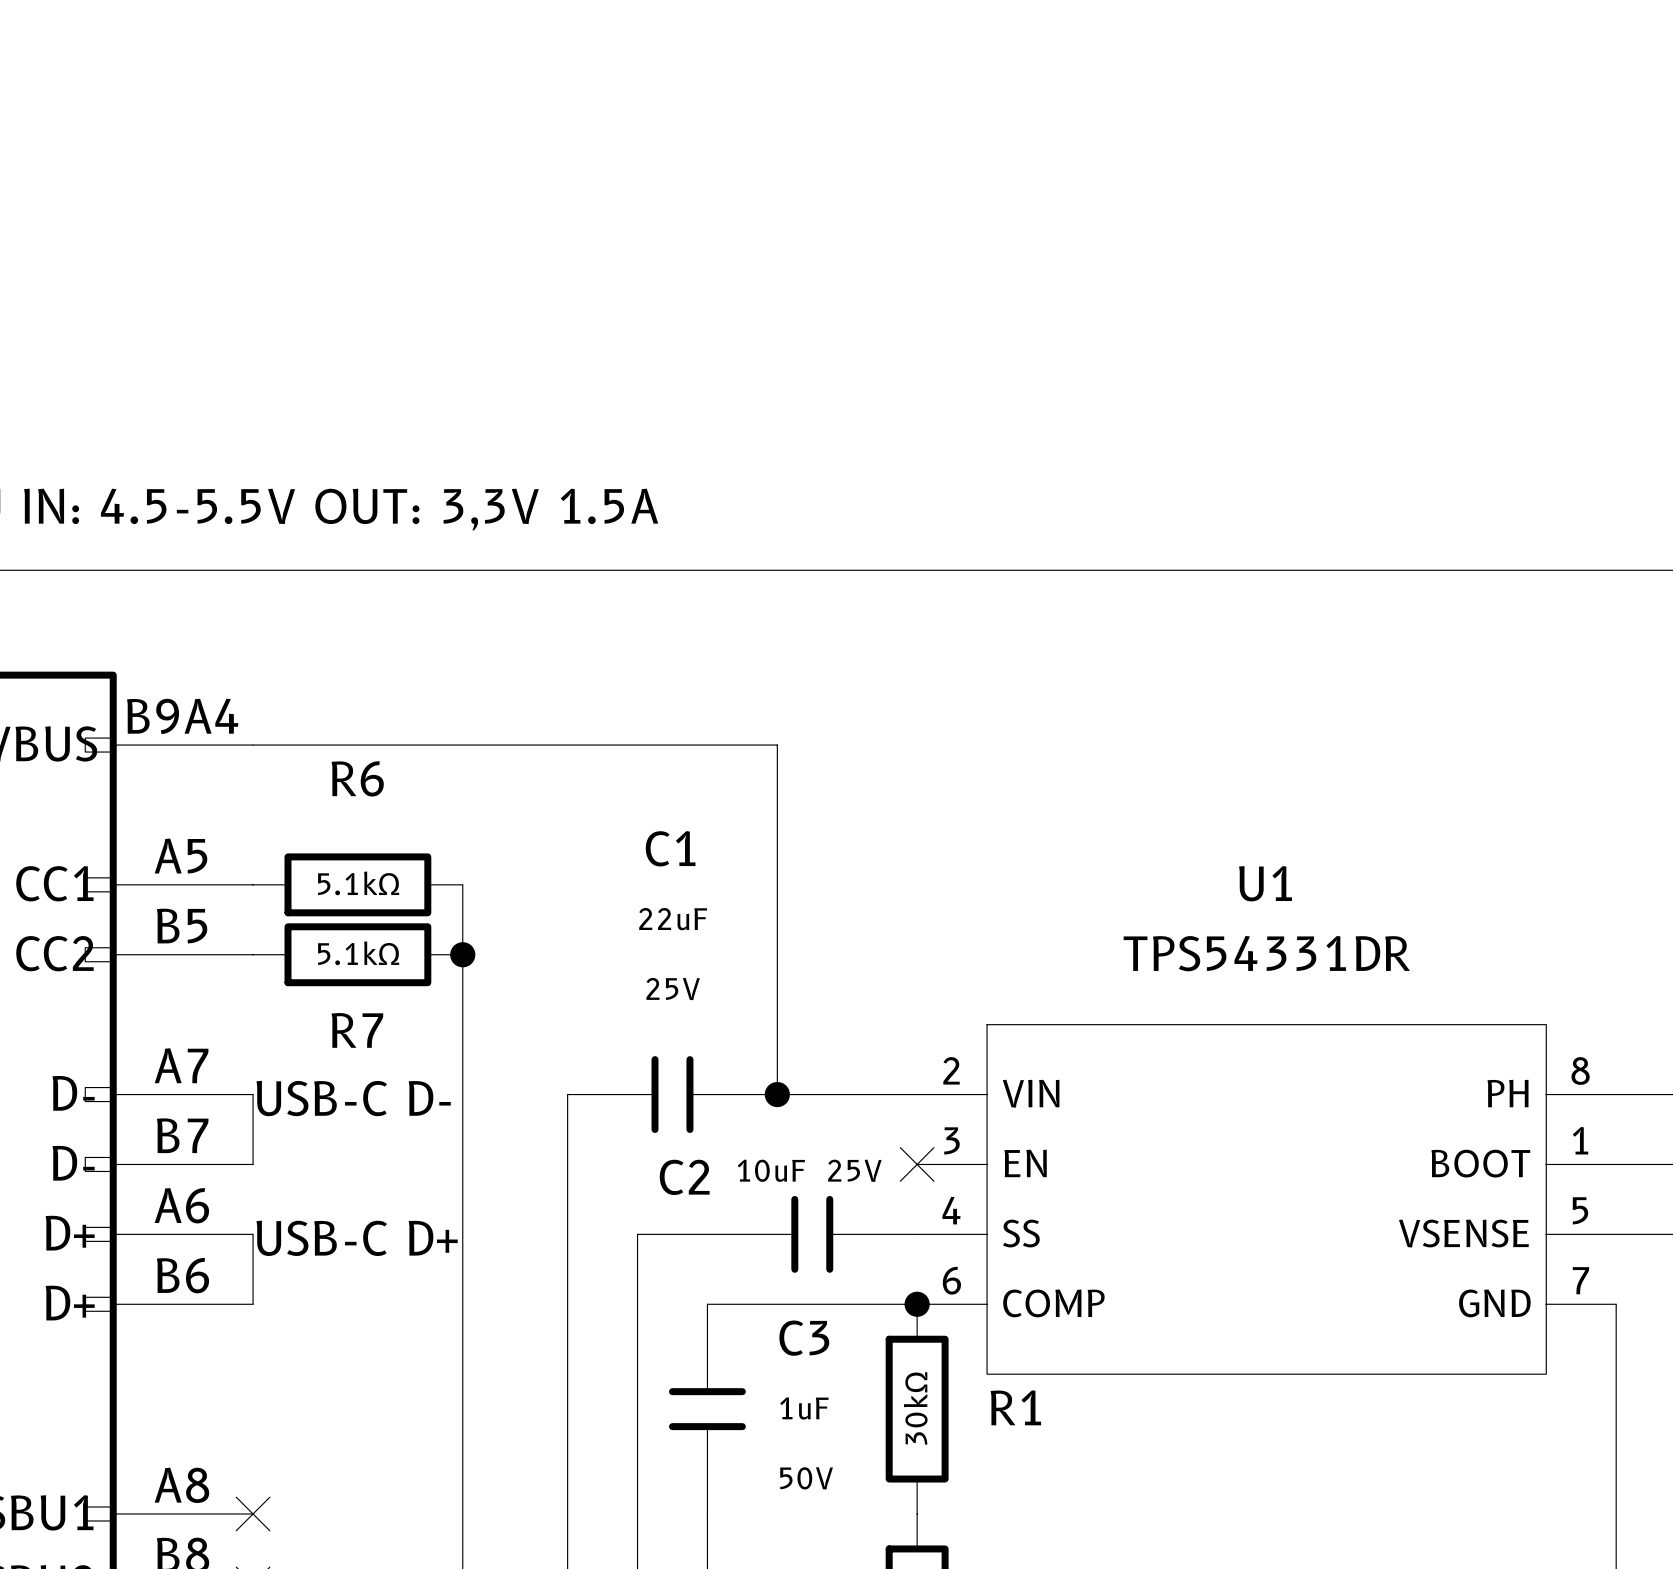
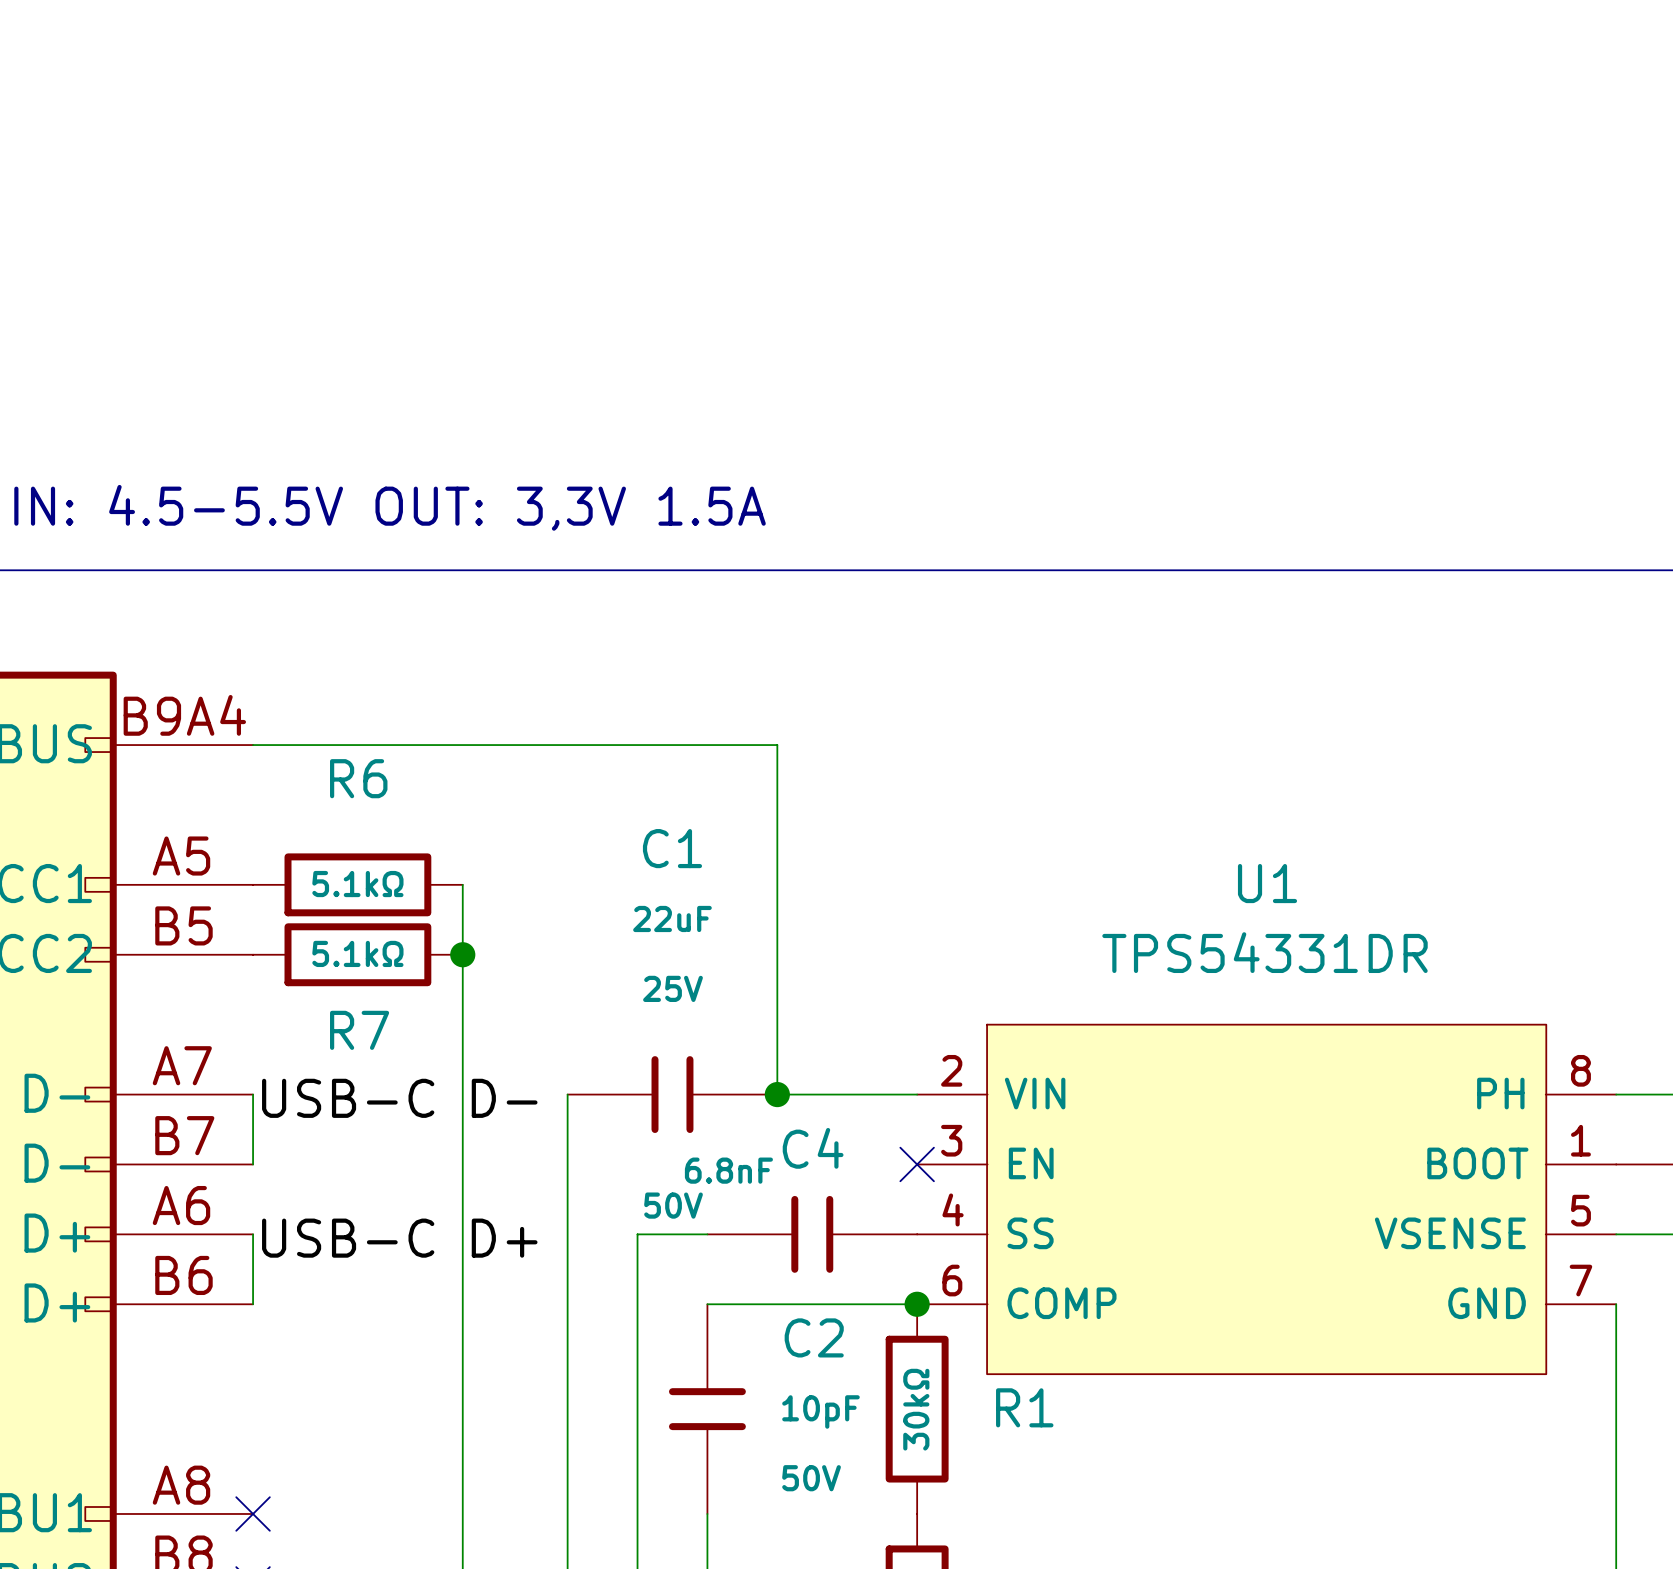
C2 value: 10uF (771, 1170) -> 6.8nF (728, 1170)
C2 text: 25V (854, 1170) -> 50V (673, 1205)
C2 name: C2 (684, 1177) -> C4 (813, 1148)
C3 name: C3 (804, 1338) -> C2 (814, 1337)
C3 value: 1uF (804, 1408) -> 10pF (820, 1411)

